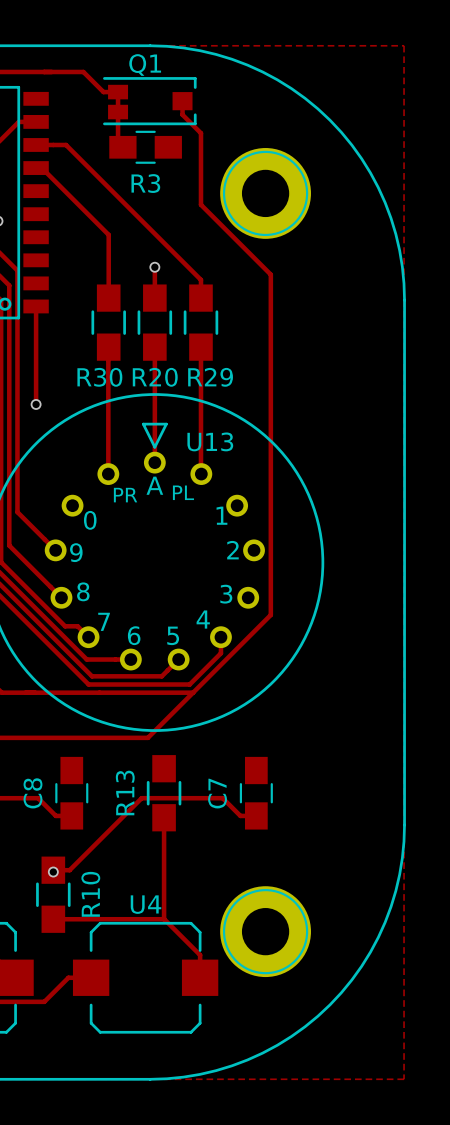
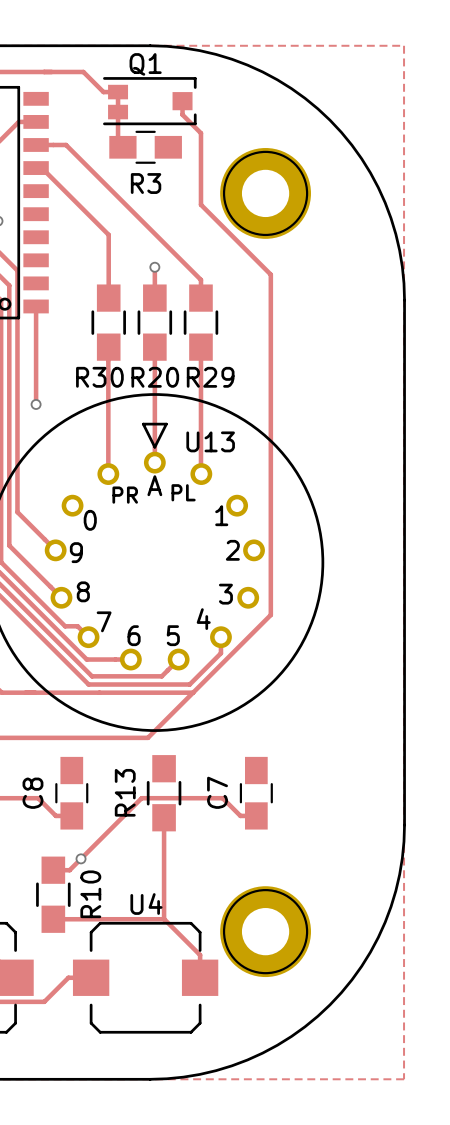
via position: (53, 872) -> (81, 858)

